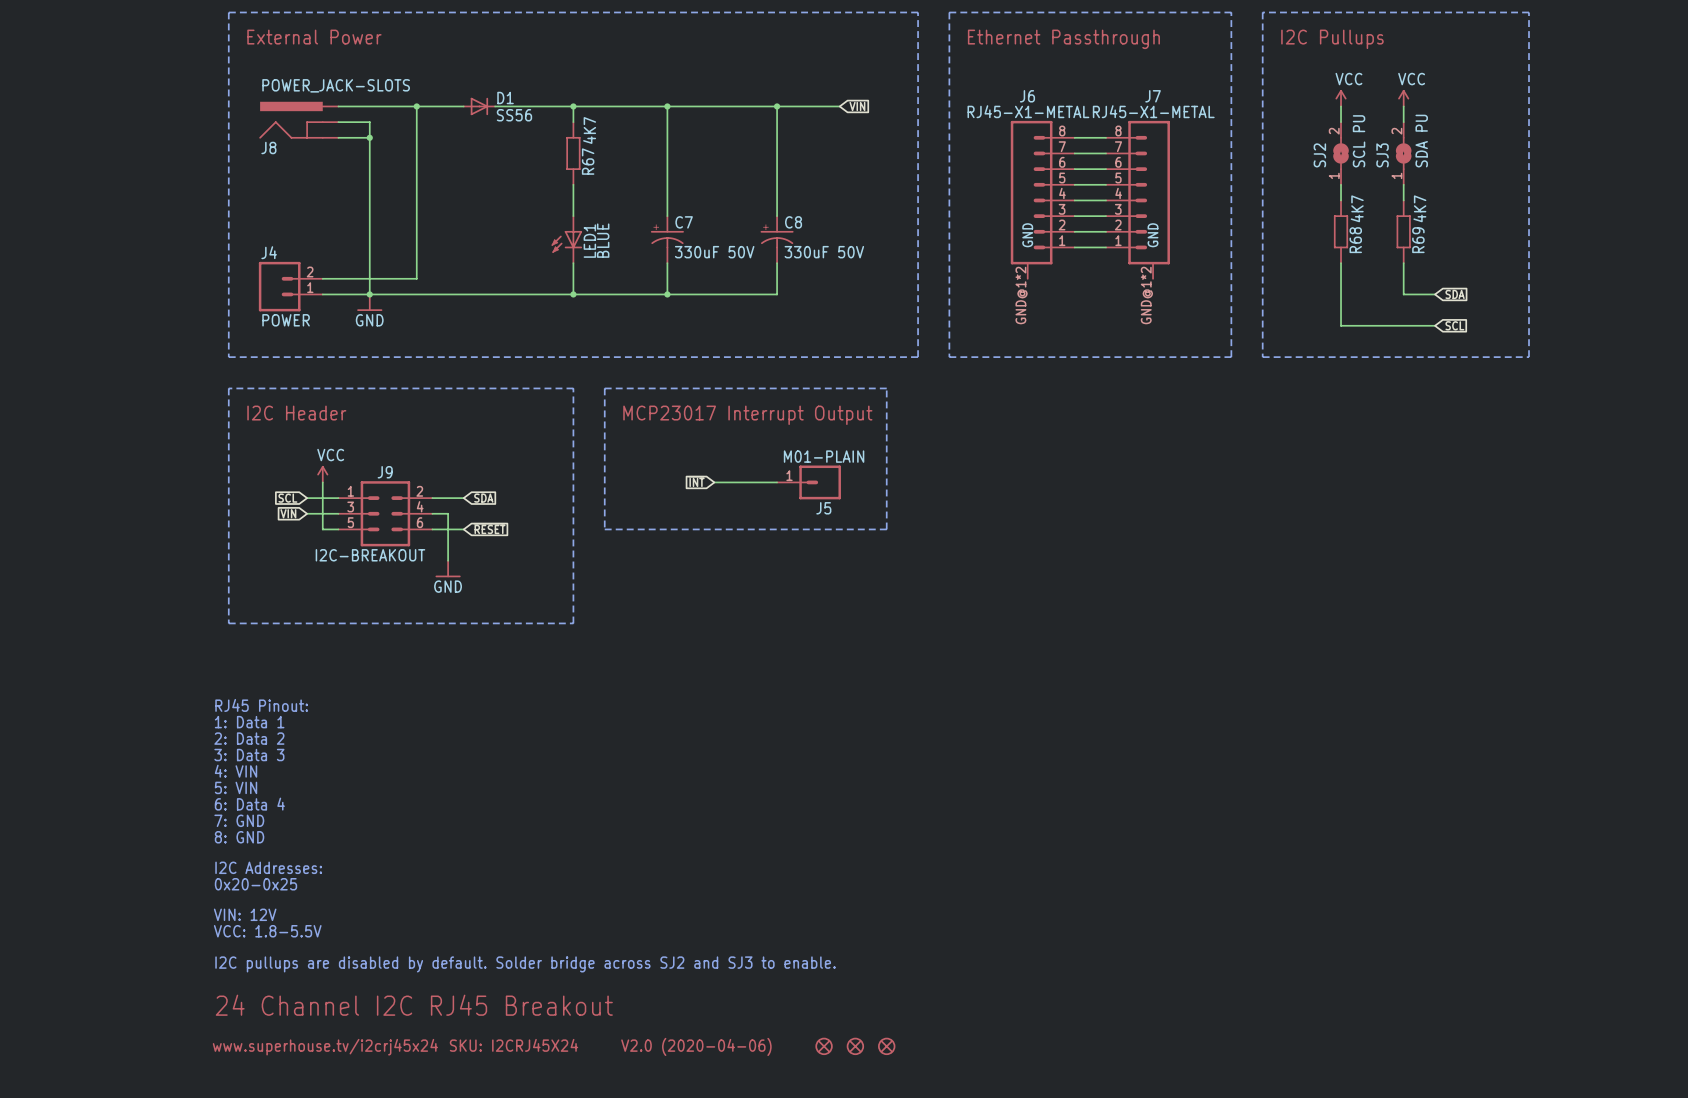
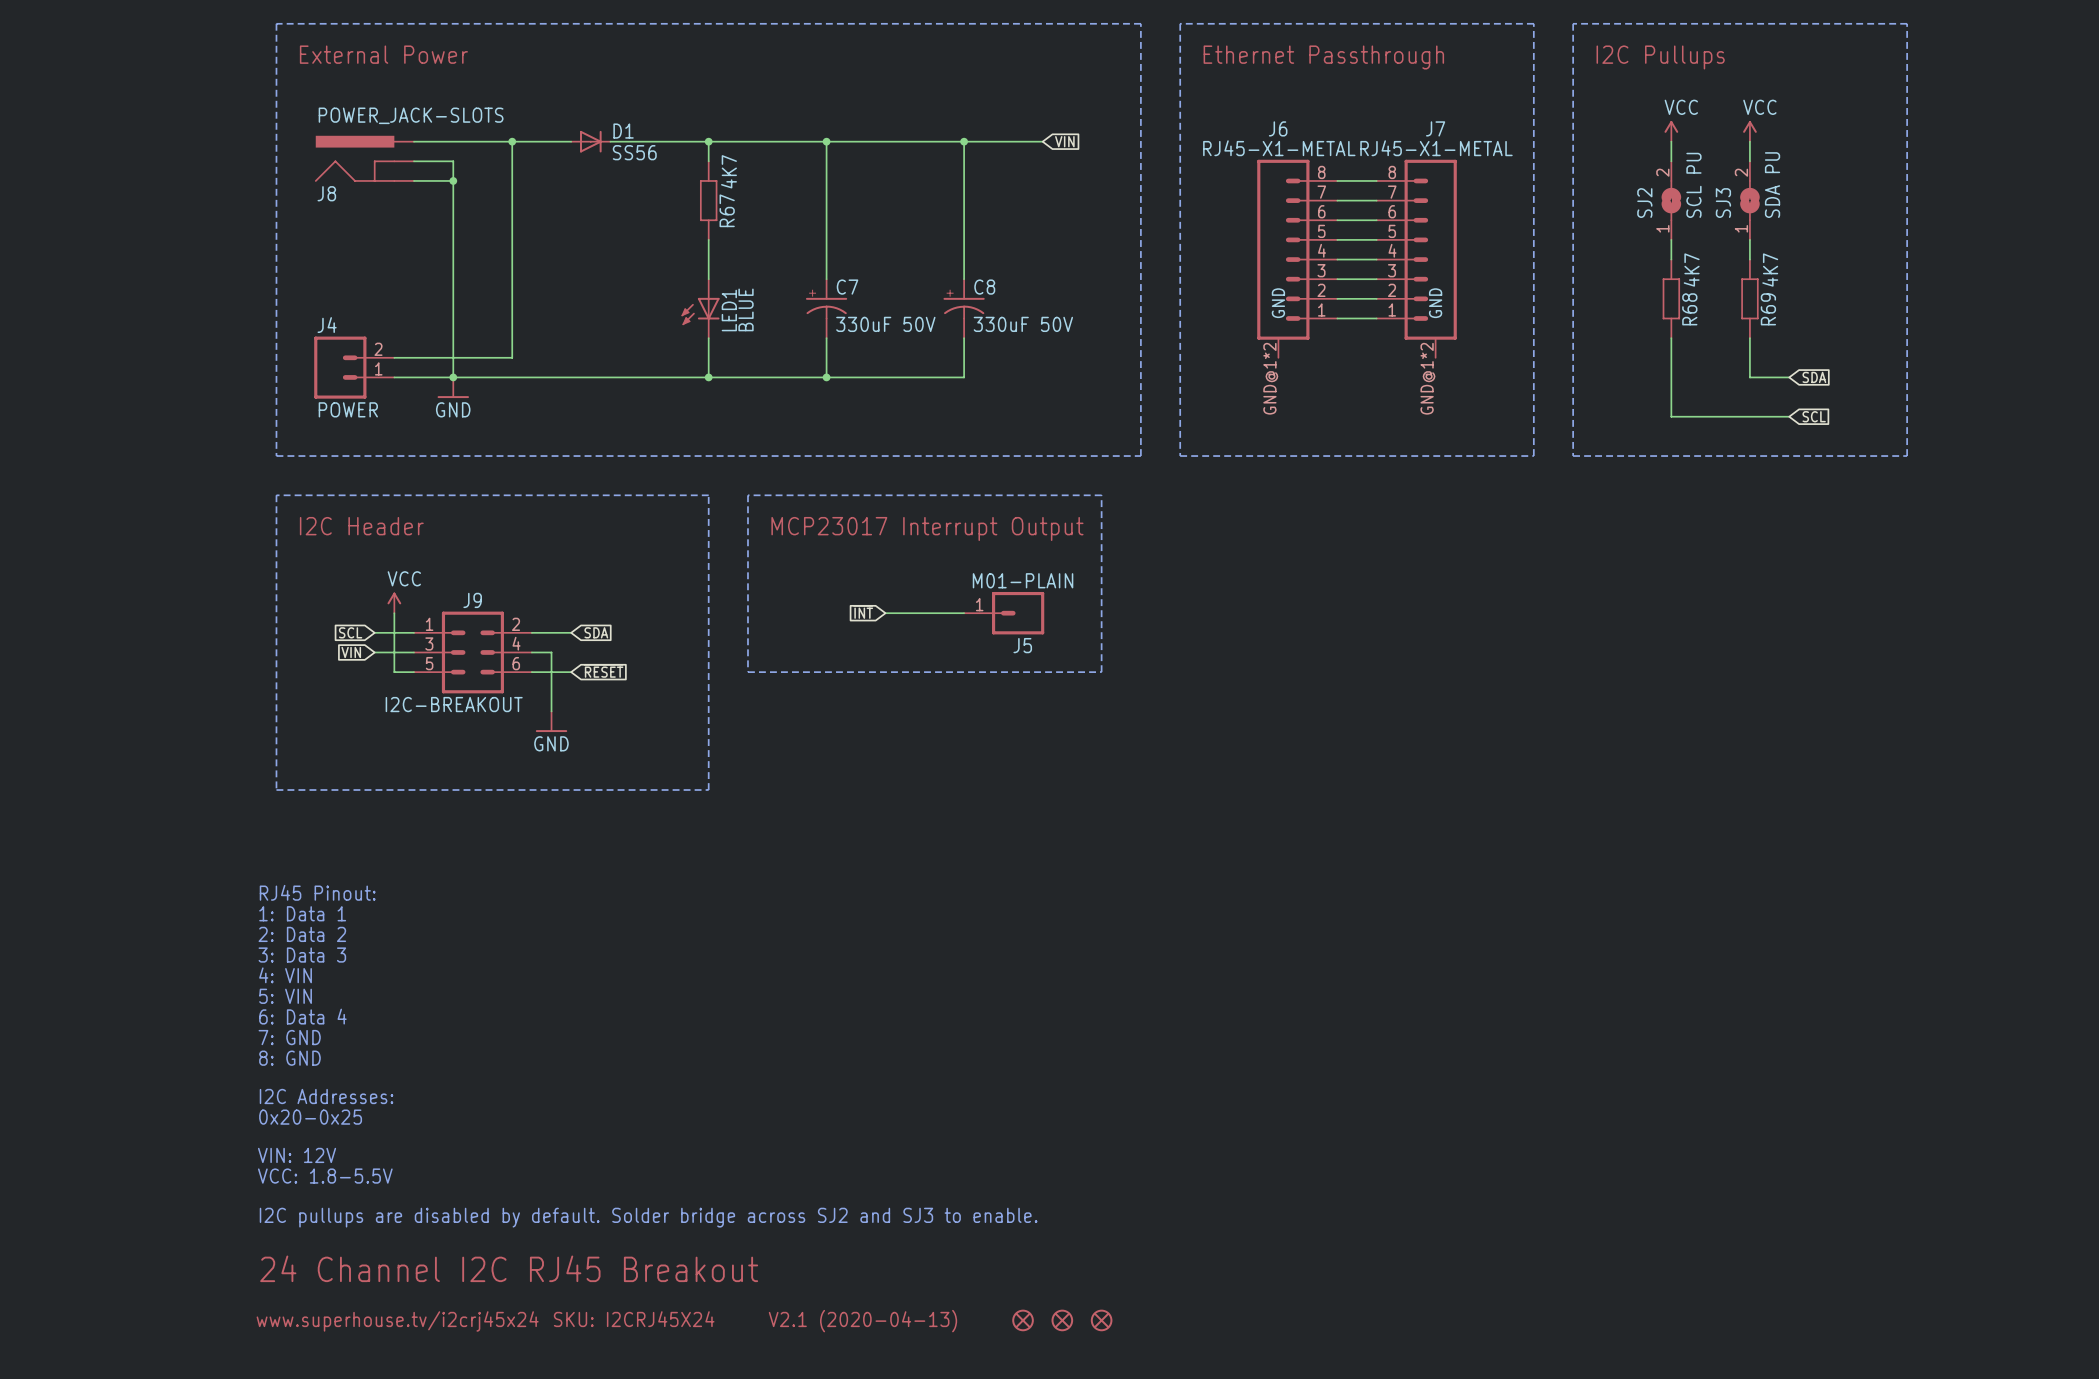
text: V2.0 (2020-04-06) (696, 1046) -> V2.1 (2020-04-13) (862, 1321)

